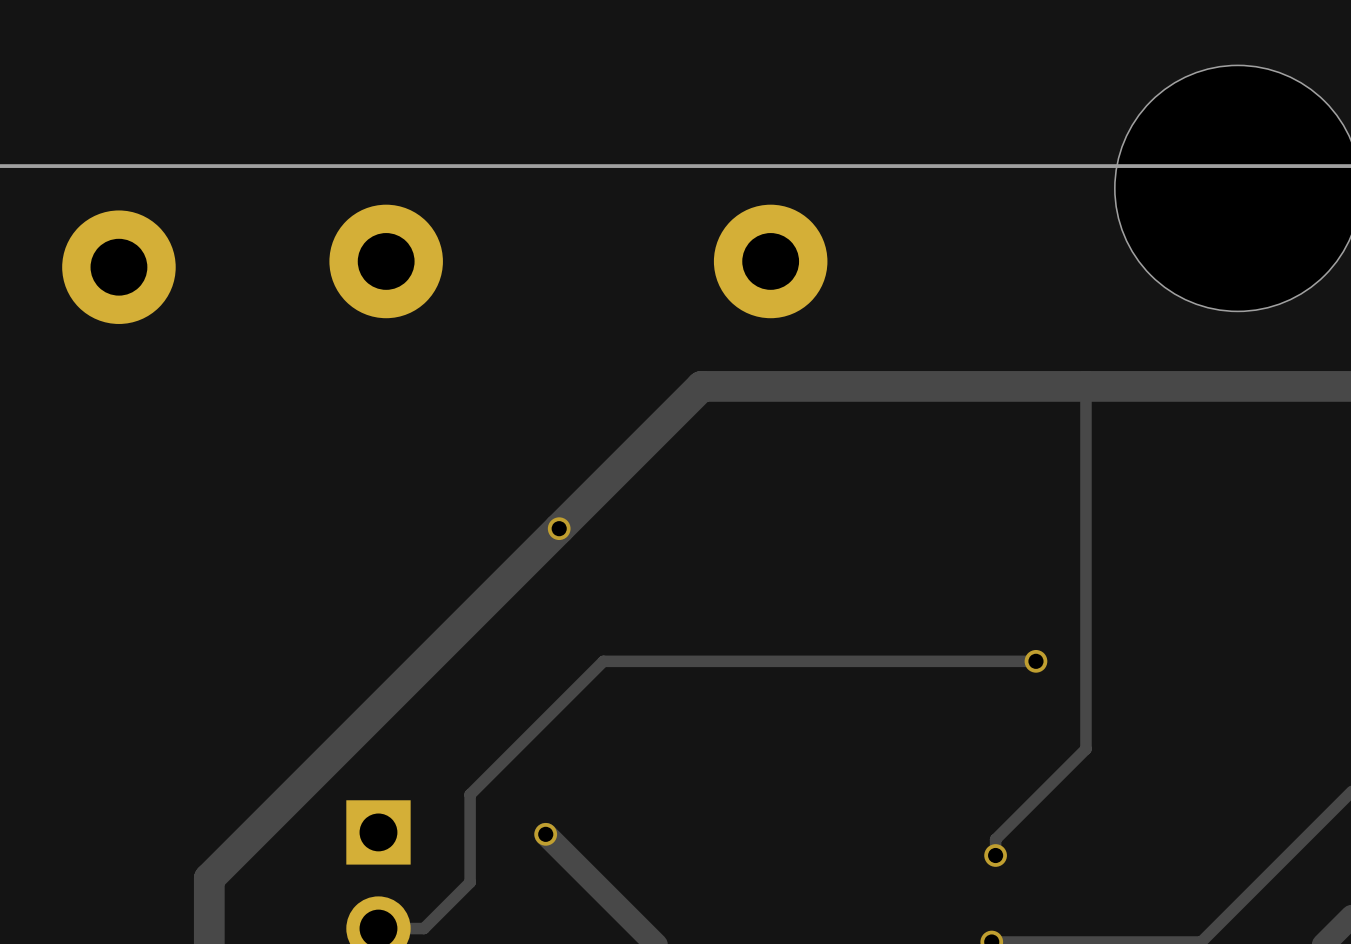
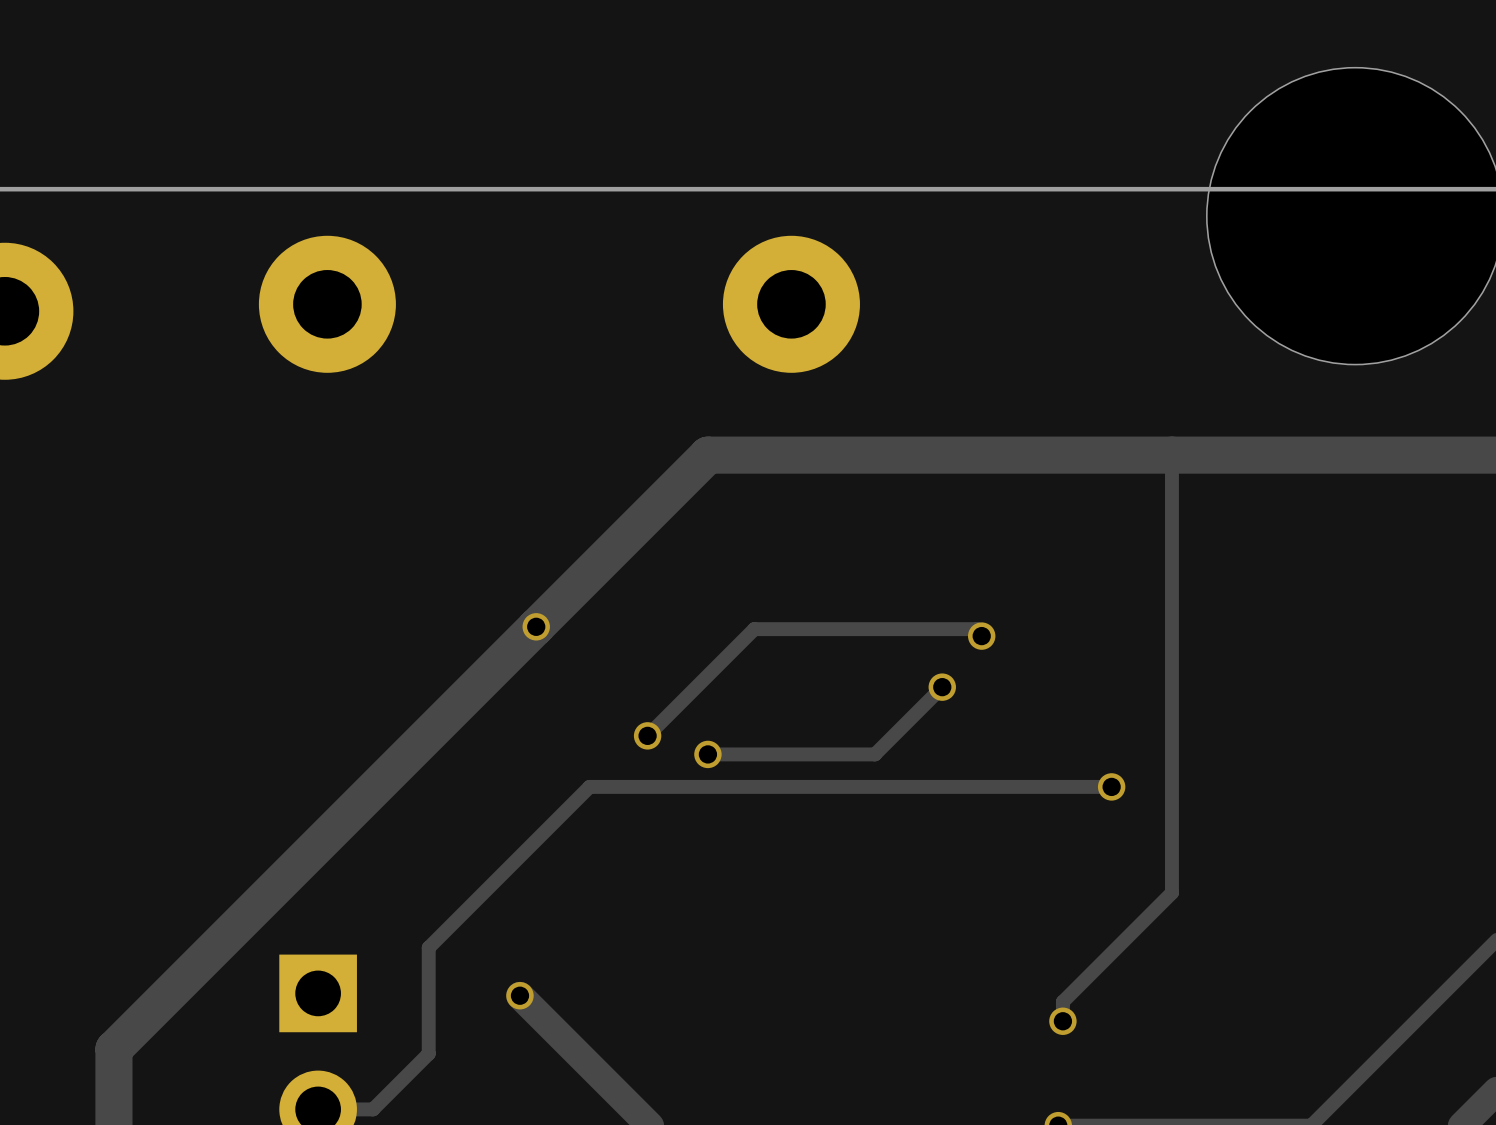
track: none -> (981, 636) (977, 629) (754, 629) (647, 735)
via: none -> (981, 636)
track: none -> (942, 687) (874, 754) (707, 754)
via: none -> (942, 687)
via: none -> (647, 735)
via: none -> (707, 754)

